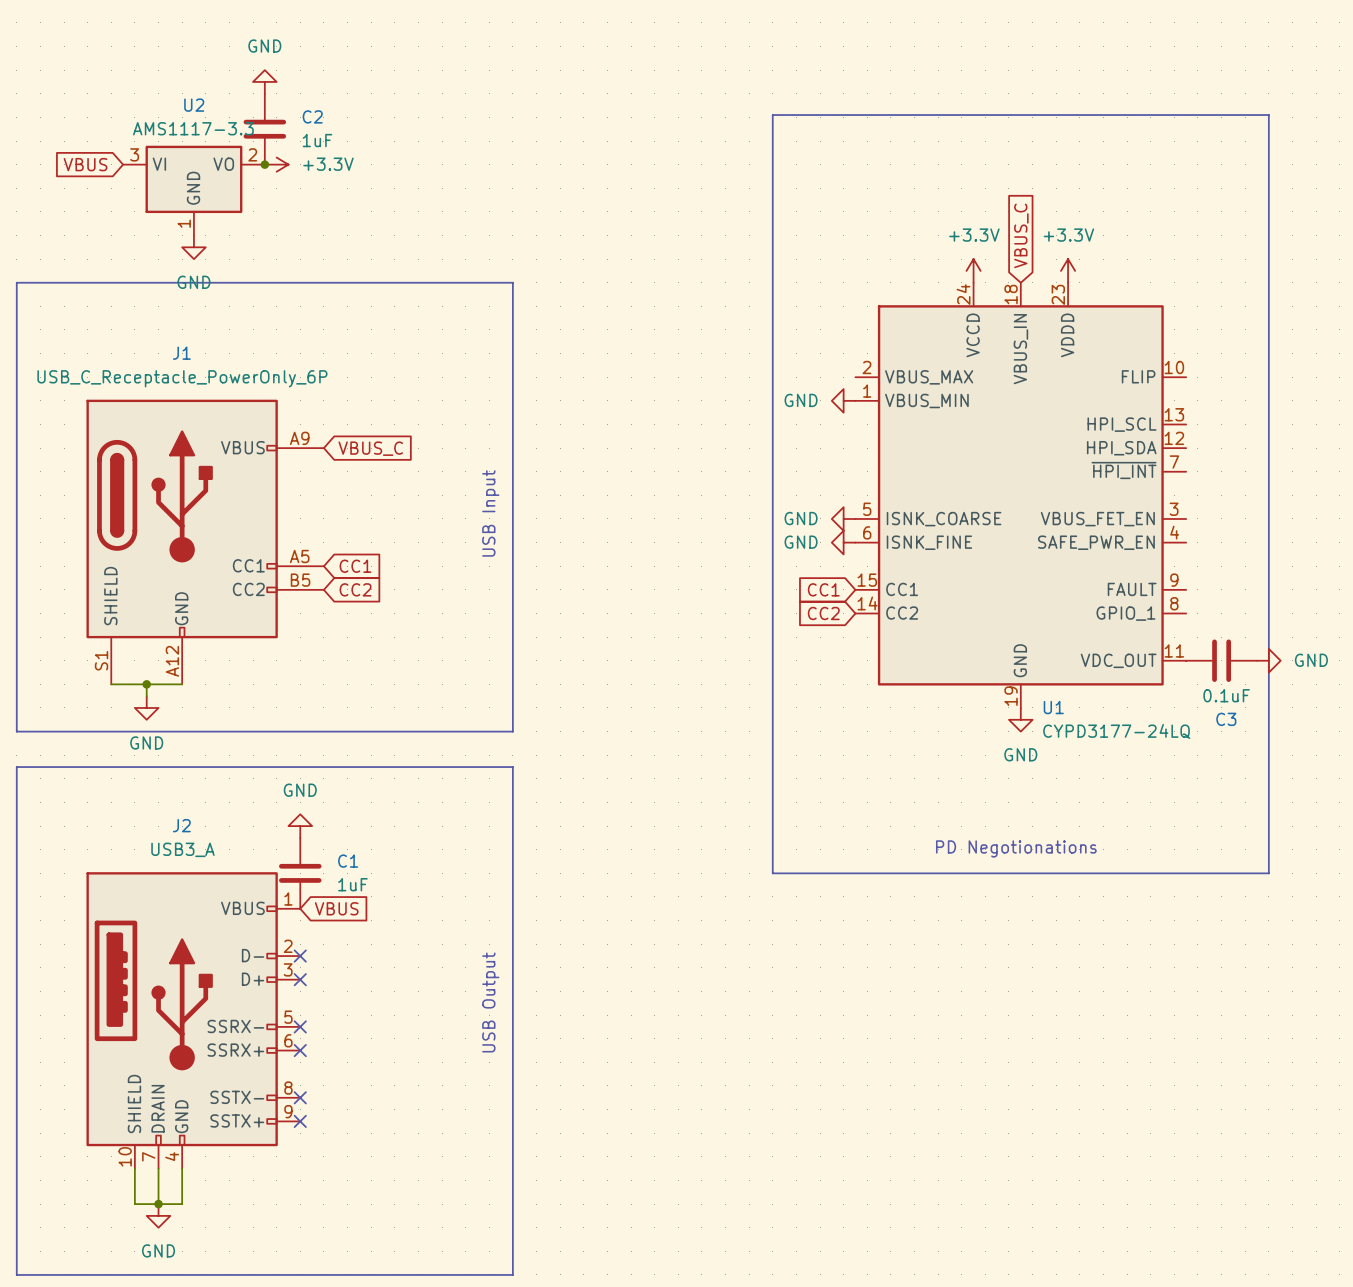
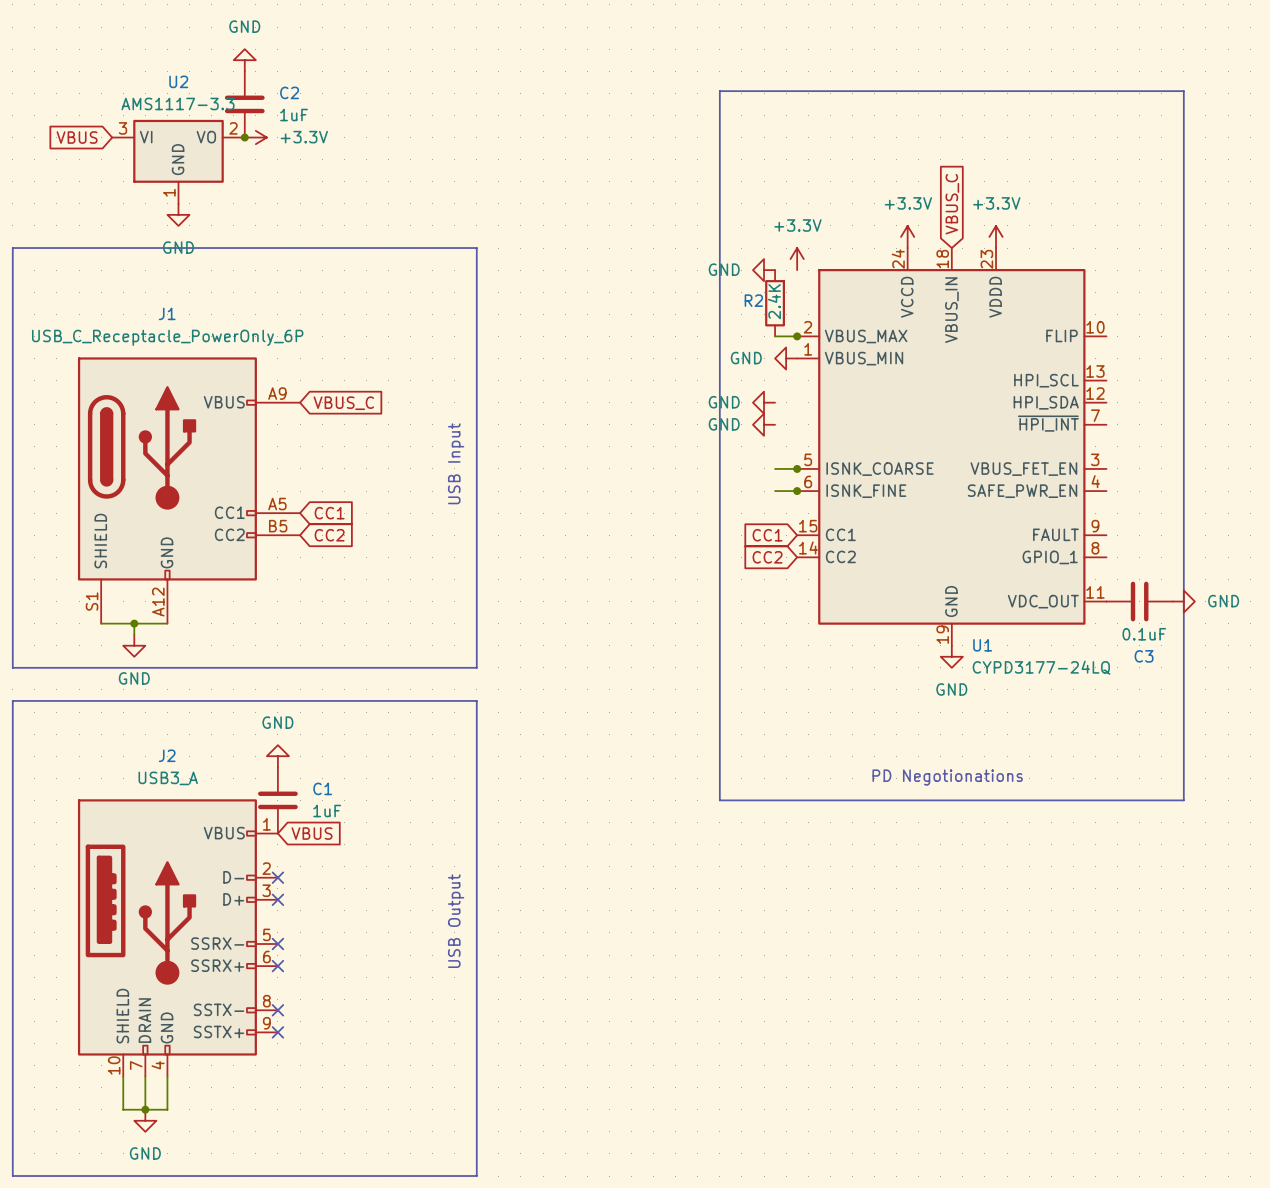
power symbol: none -> +3.3V (797, 259)
power symbol: none -> GND (764, 270)
R2: none -> 2.4K (775, 303)
wire: none -> (775, 336) (797, 336)
junction: none -> (797, 336)
power symbol: none -> GND (764, 402)
power symbol: none -> GND (764, 424)
power symbol: GND (843, 518) -> none
junction: none -> (797, 468)
power symbol: GND (843, 542) -> none
junction: none -> (797, 491)

